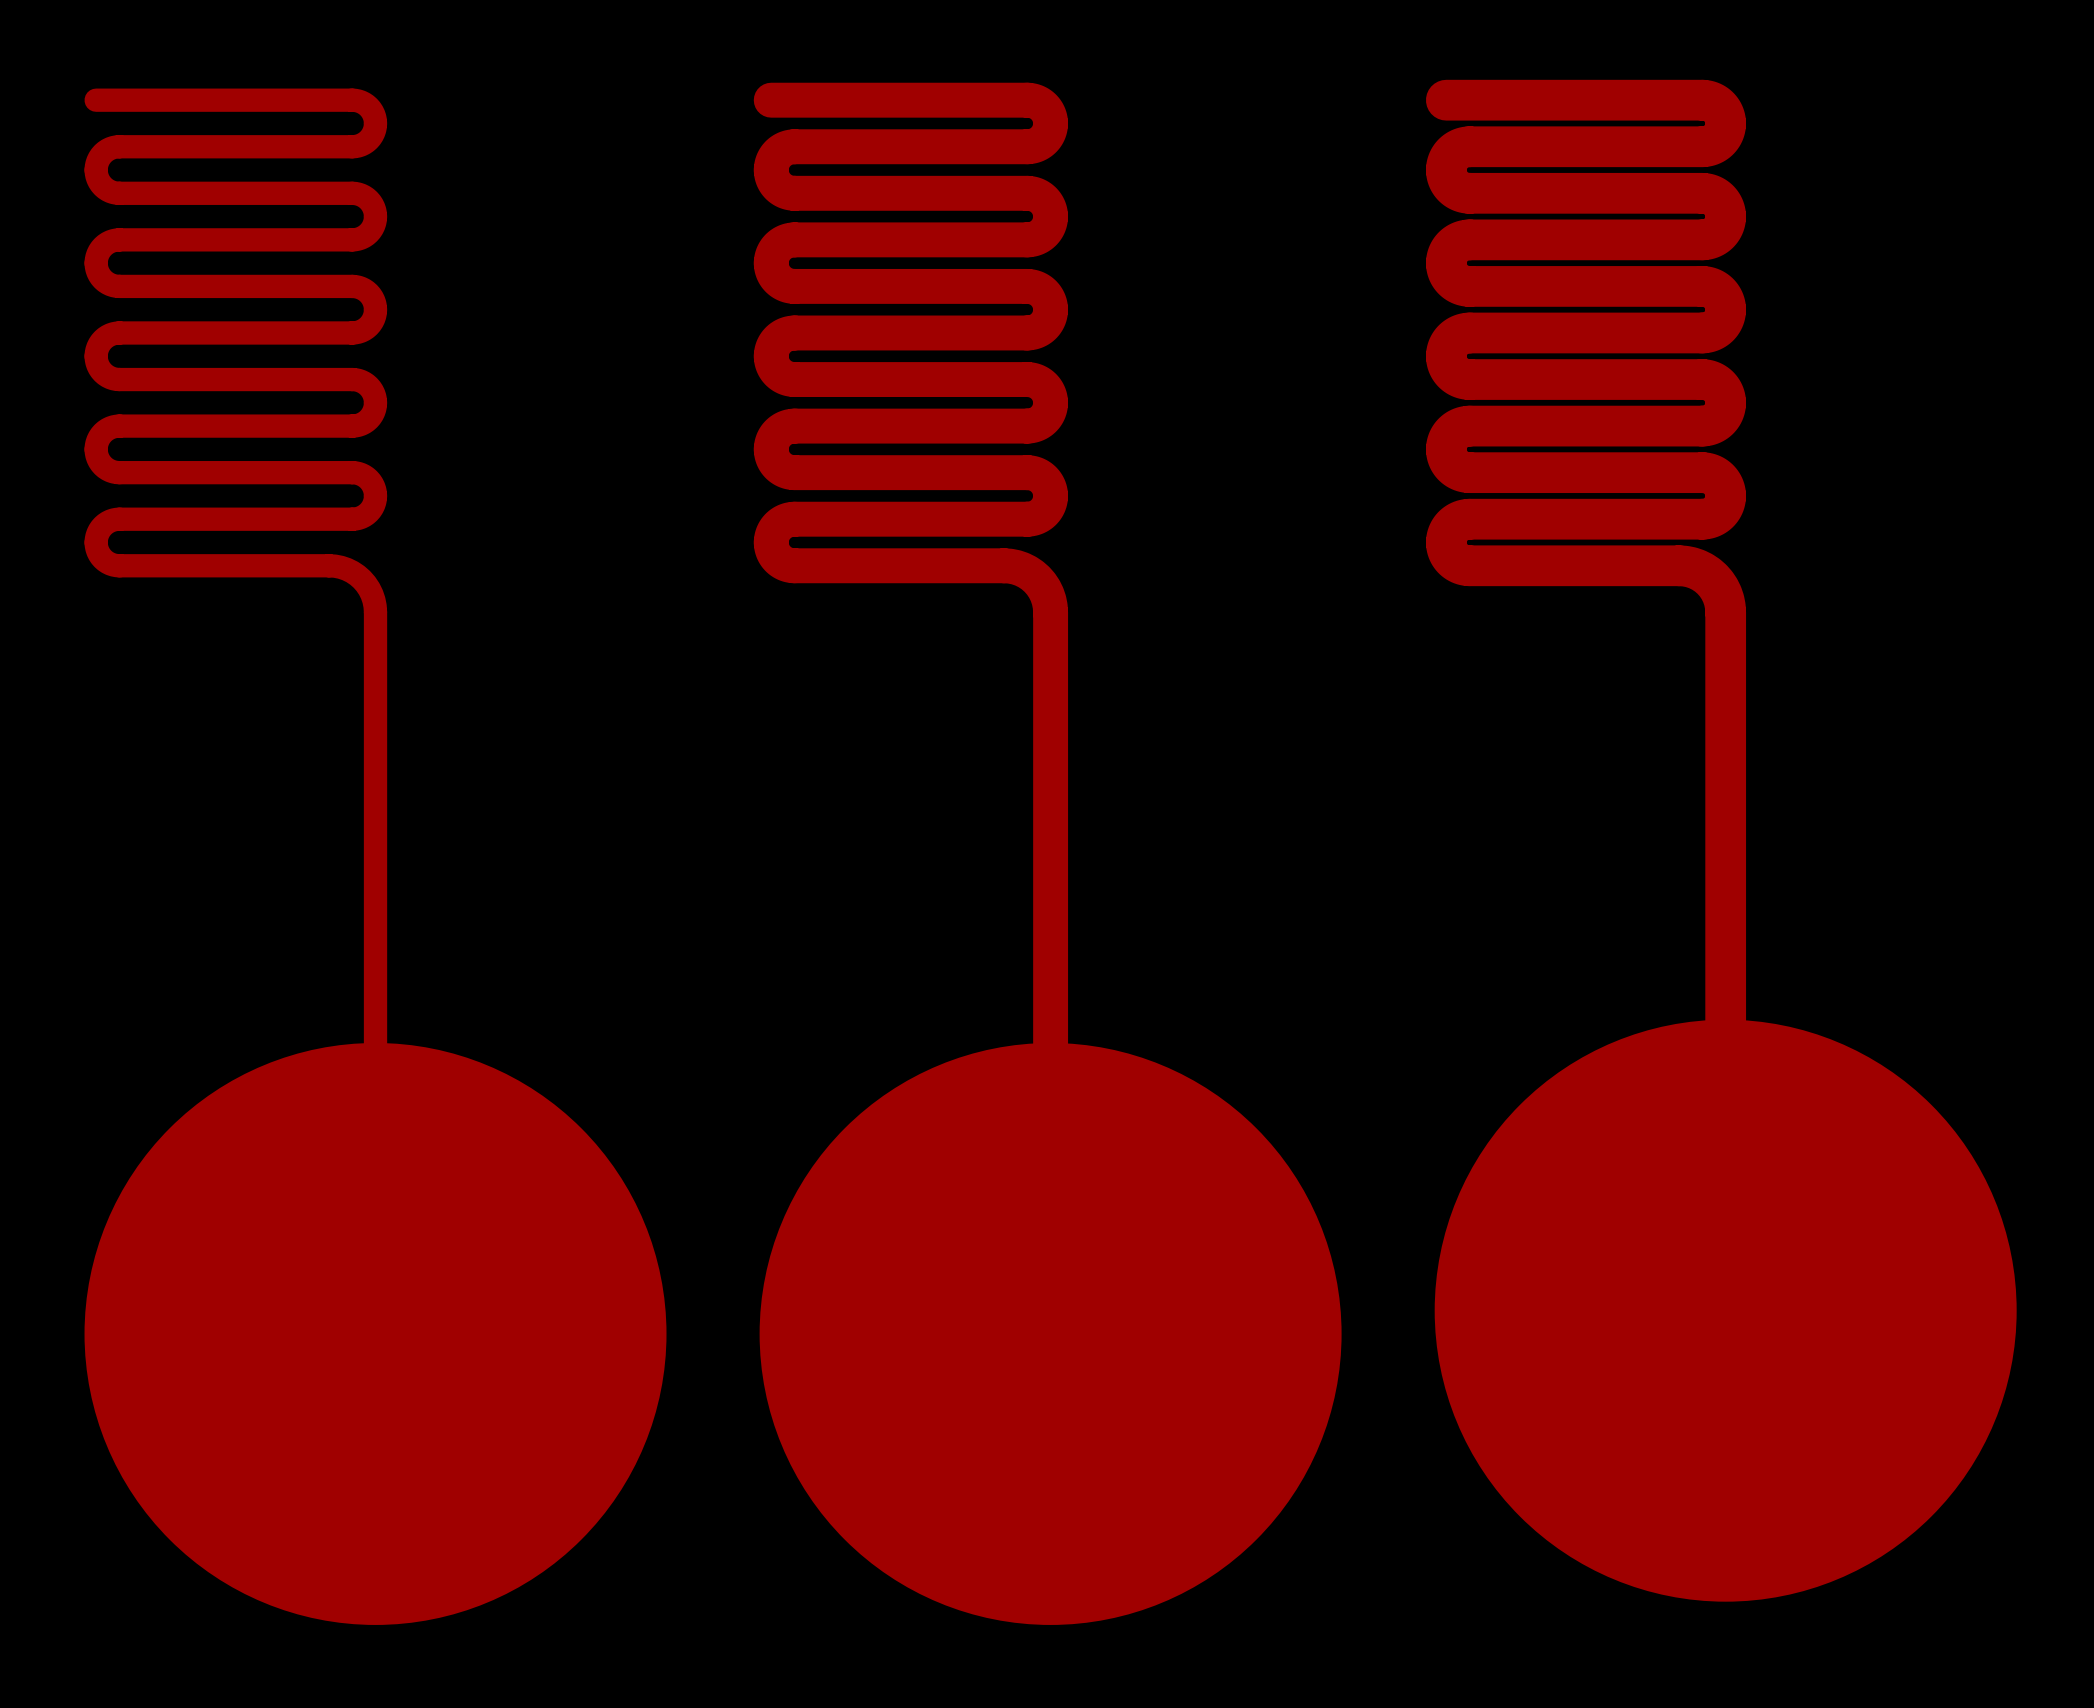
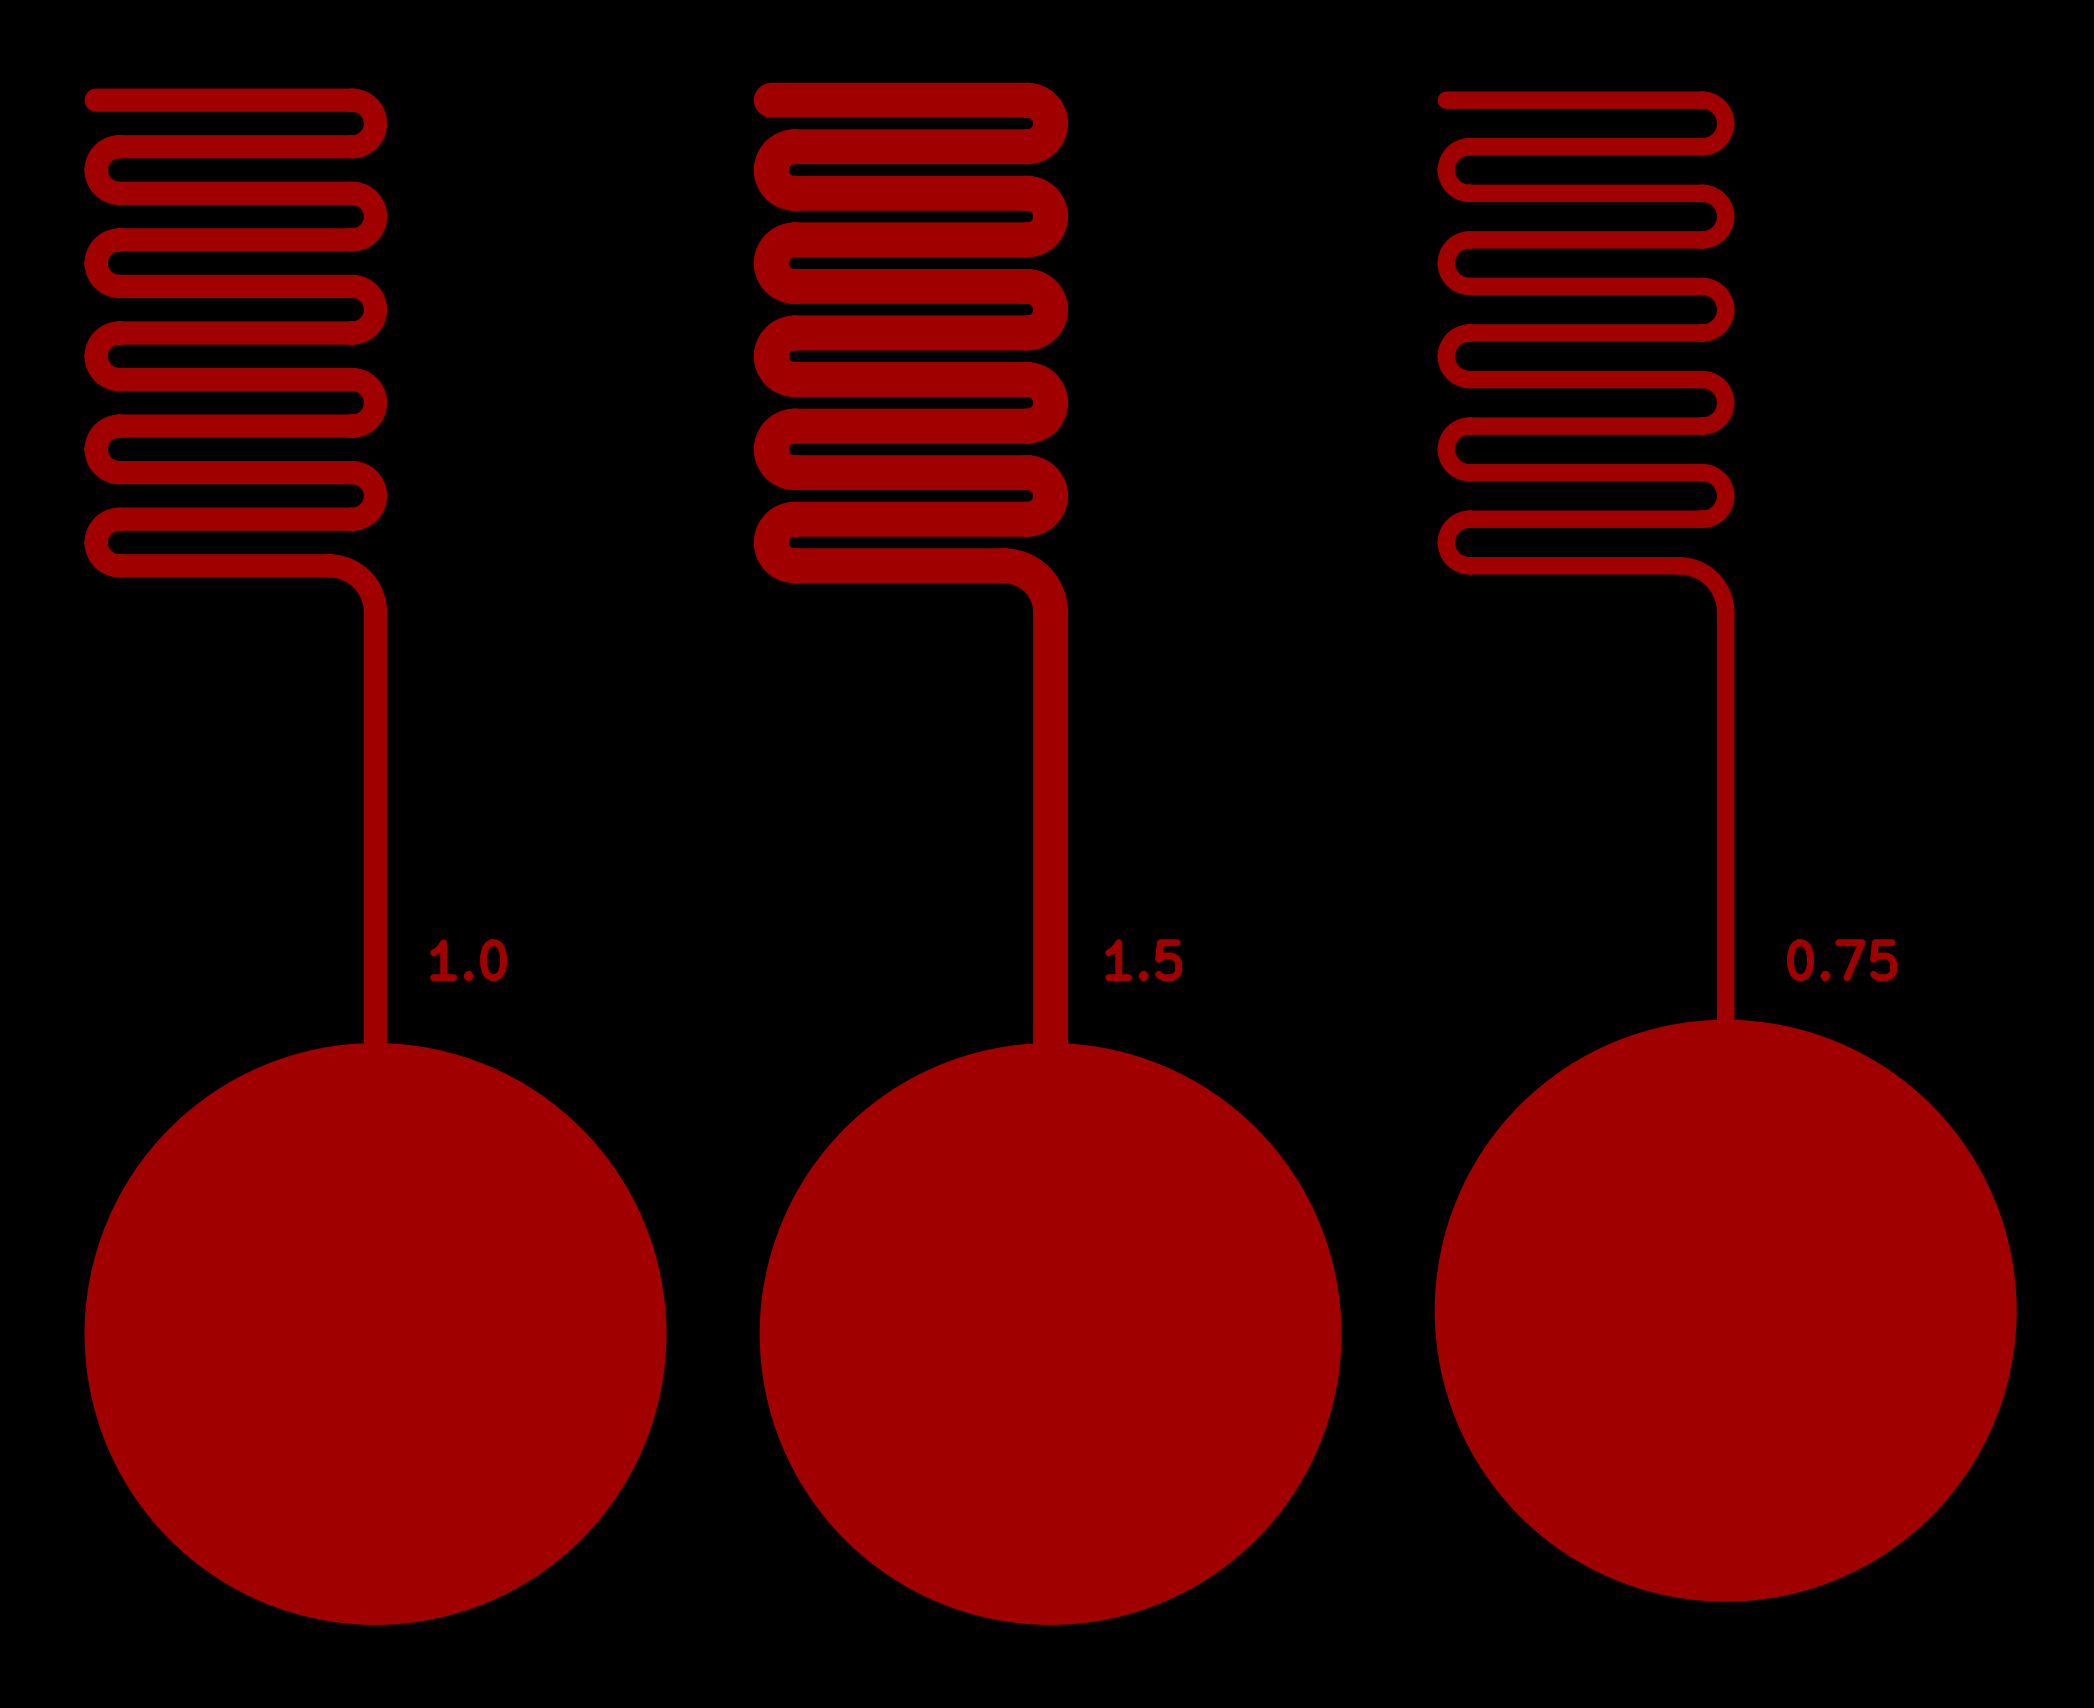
track width: thick (1446, 100) (1702, 100) (1716, 105) (1724, 117) (1725, 126) (1720, 137) (1714, 143) (1705, 146) (1466, 146) (1457, 149) (1451, 155) (1446, 170) (1451, 184) (1457, 190) (1466, 193) (1702, 193) (1711, 195) (1720, 202) (1725, 213) (1724, 222) (1718, 233) (1708, 239) (1466, 240) (1457, 242) (1451, 248) (1446, 263) (1451, 277) (1457, 283) (1466, 286) (1702, 286) (1714, 289) (1722, 298) (1725, 312) (1720, 323) (1708, 332) (1466, 333) (1457, 336) (1451, 342) (1446, 356) (1451, 370) (1457, 376) (1466, 379) (1708, 380) (1718, 386) (1724, 396) (1724, 408) (1718, 419) (1711, 424) (1702, 426) (1466, 426) (1457, 429) (1451, 435) (1446, 449) (1451, 463) (1457, 469) (1466, 472) (1708, 473) (1718, 479) (1723, 487) (1725, 498) (1722, 507) (1714, 516) (1702, 519) (1466, 519) (1457, 522) (1451, 528) (1446, 542) (1451, 556) (1457, 562) (1466, 565) (1685, 566) (1702, 572) (1712, 579) (1719, 589) (1724, 600) (1725, 612) (1725, 1101) -> thin (1446, 100) (1702, 100) (1716, 105) (1724, 117) (1725, 126) (1720, 137) (1714, 143) (1705, 146) (1466, 146) (1457, 149) (1451, 155) (1446, 170) (1451, 184) (1457, 190) (1466, 193) (1702, 193) (1711, 195) (1720, 202) (1725, 213) (1724, 222) (1718, 233) (1708, 239) (1466, 240) (1457, 242) (1451, 248) (1446, 263) (1451, 277) (1457, 283) (1466, 286) (1702, 286) (1714, 289) (1722, 298) (1725, 312) (1720, 323) (1708, 332) (1466, 333) (1457, 336) (1451, 342) (1446, 356) (1451, 370) (1457, 376) (1466, 379) (1708, 380) (1718, 386) (1724, 396) (1724, 408) (1718, 419) (1711, 424) (1702, 426) (1466, 426) (1457, 429) (1451, 435) (1446, 449) (1451, 463) (1457, 469) (1466, 472) (1708, 473) (1718, 479) (1723, 487) (1725, 498) (1722, 507) (1714, 516) (1702, 519) (1466, 519) (1457, 522) (1451, 528) (1446, 542) (1451, 556) (1457, 562) (1466, 565) (1685, 566) (1702, 572) (1712, 579) (1719, 589) (1724, 600) (1725, 612) (1725, 1101)
text: none -> 1.0 (468, 960)
text: none -> 1.5 (1143, 960)
text: none -> 0.75 (1842, 960)

